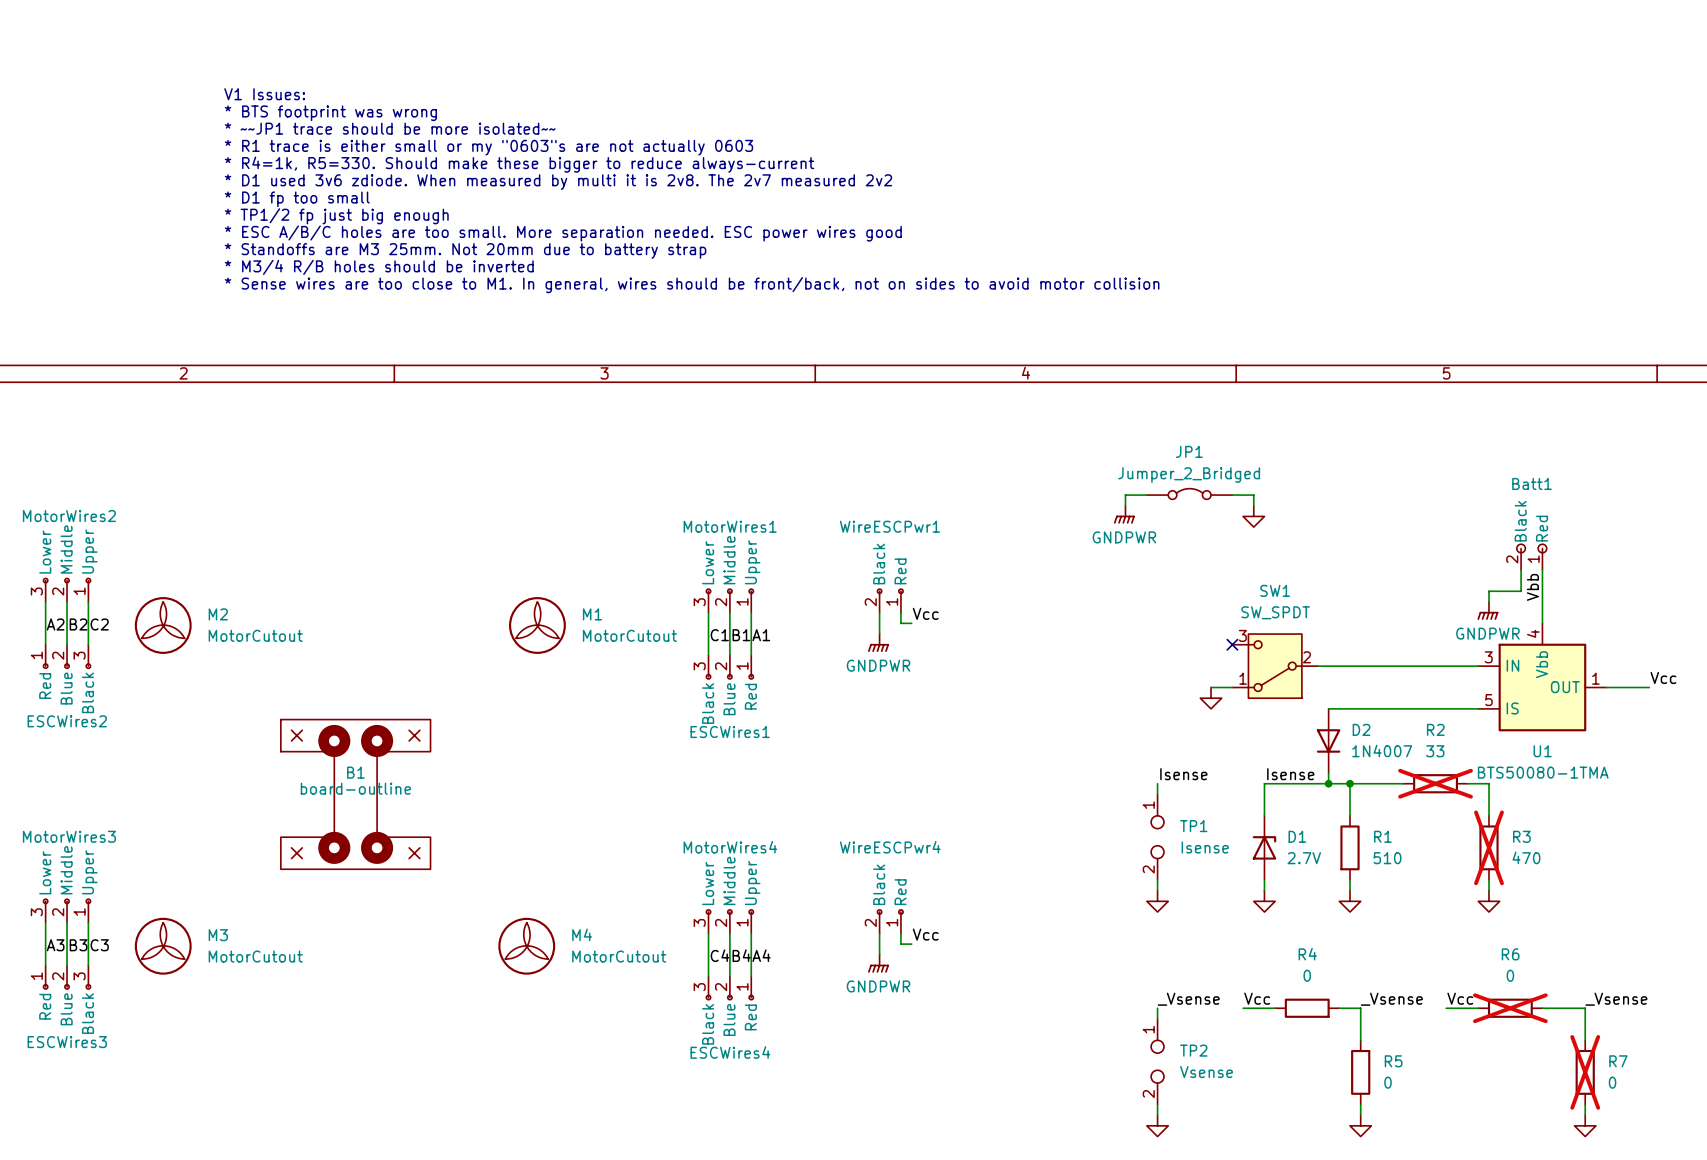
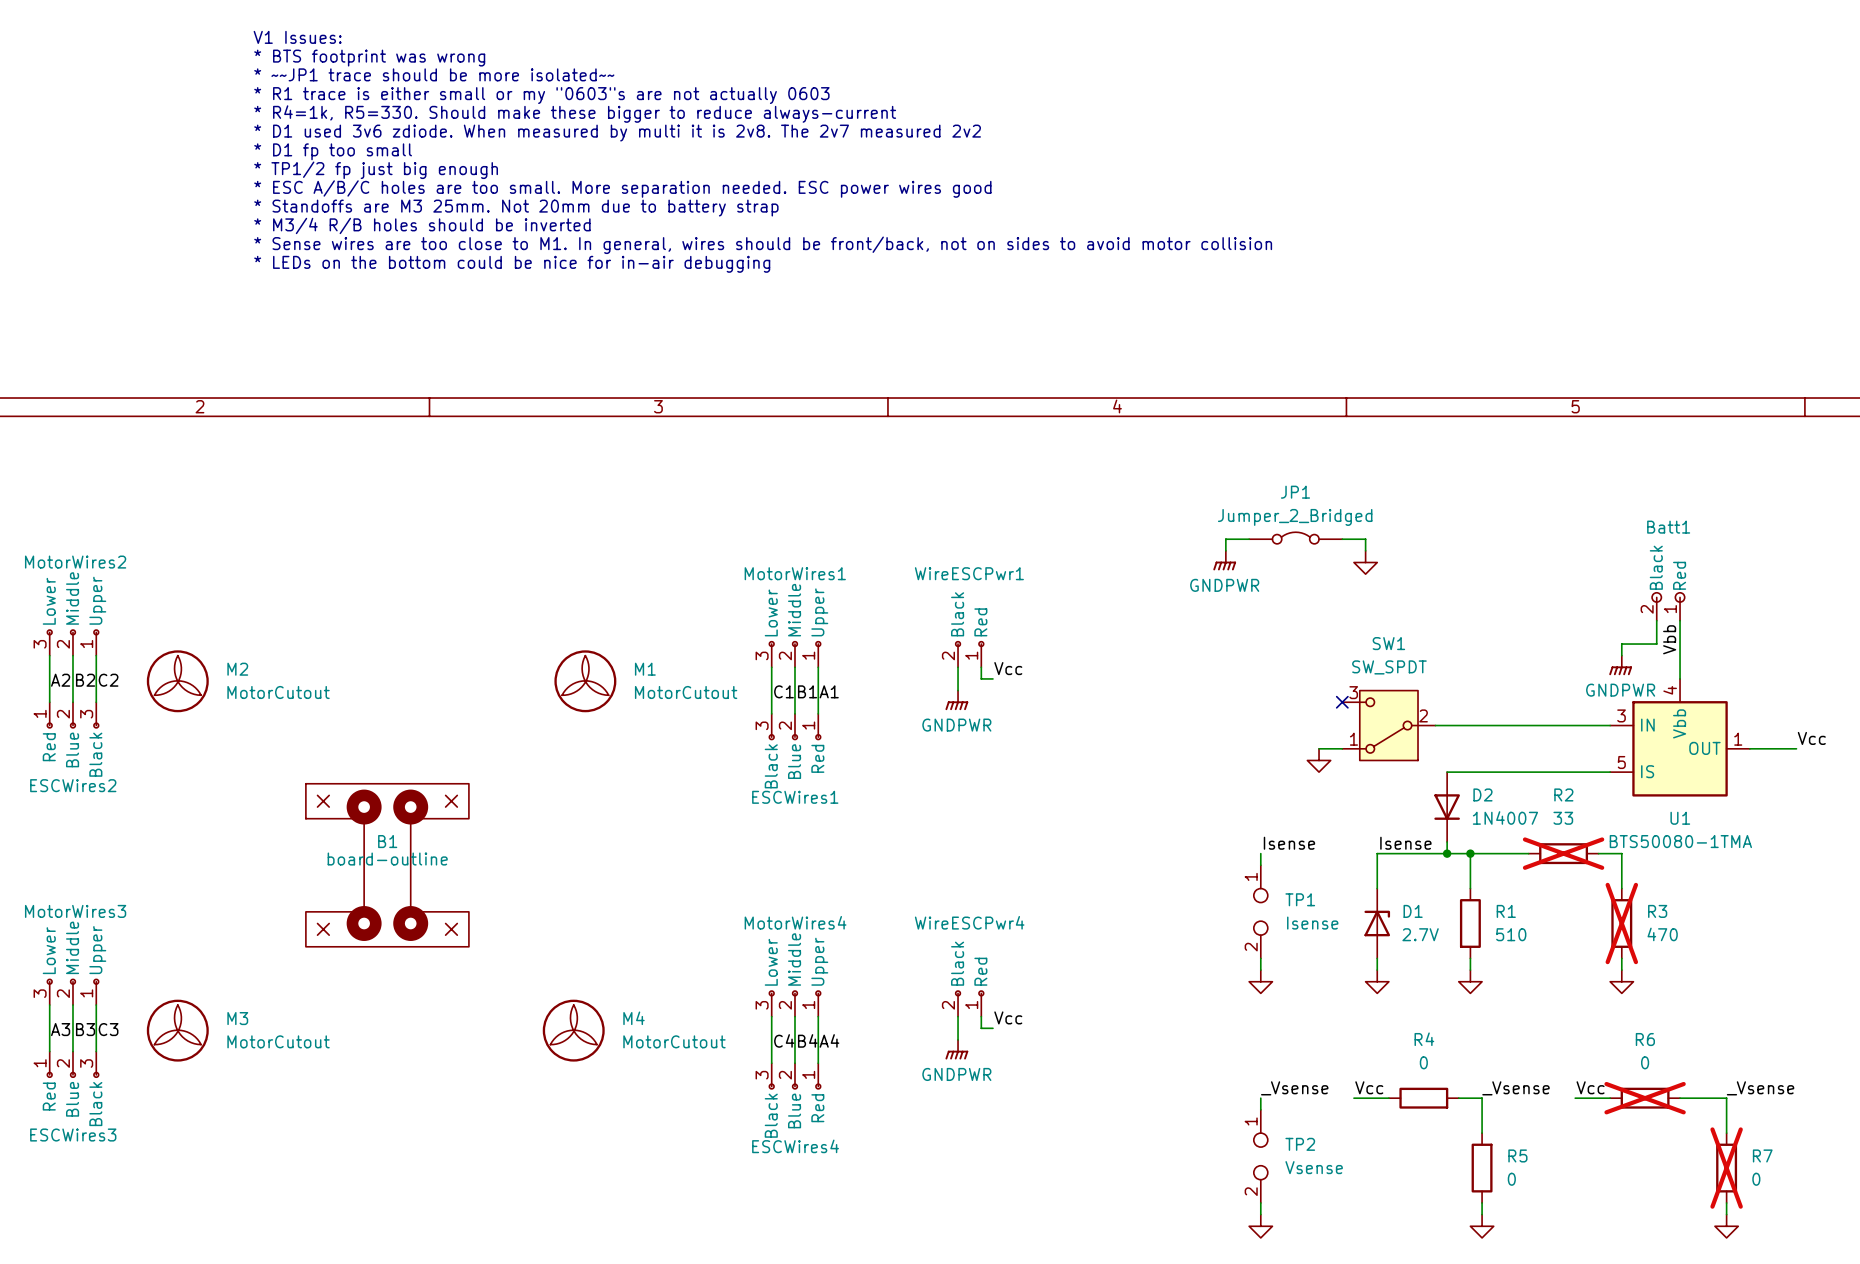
text position: V1 Issues: (264, 94) -> V1 Issues: (297, 37)
text position: * BTS footprint was wrong (330, 113) -> * BTS footprint was wrong (369, 58)
text position: * ~~JP1 trace should be more isolated~~ (390, 128) -> * ~~JP1 trace should be more isolated~~ (434, 74)
text position: * R1 trace is either small or my "0603"s are not actually 0603 (488, 147) -> * R1 trace is either small or my "0603"s are not actually 0603 (541, 95)
text position: * R4=1k, R5=330. Should make these bigger to reduce always-current (519, 164) -> * R4=1k, R5=330. Should make these bigger to reduce always-current (575, 114)
text position: * D1 used 3v6 zdiode. When measured by multi it is 2v8. The 2v7 measured 2v2 (558, 182) -> * D1 used 3v6 zdiode. When measured by multi it is 2v8. The 2v7 measured 2v2 (617, 133)
text position: * D1 fp too small (297, 199) -> * D1 fp too small (333, 151)
text position: * TP1/2 fp just big enough (336, 216) -> * TP1/2 fp just big enough (376, 170)
text position: * ESC A/B/C holes are too small. More separation needed. ESC power wires good (563, 233) -> * ESC A/B/C holes are too small. More separation needed. ESC power wires good (622, 189)
text: none -> * LEDs on the bottom could be nice for in-air debugging (512, 264)
text position: * Standoffs are M3 25mm. Not 20mm due to battery strap (465, 250) -> * Standoffs are M3 25mm. Not 20mm due to battery strap (516, 208)
text position: * M3/4 R/B holes should be inverted (379, 267) -> * M3/4 R/B holes should be inverted (422, 225)
text position: * Sense wires are too close to M1. In general, wires should be front/back, not on sides to avoid motor collision (692, 285) -> * Sense wires are too close to M1. In general, wires should be front/back, not on sides to avoid motor collision (763, 245)

